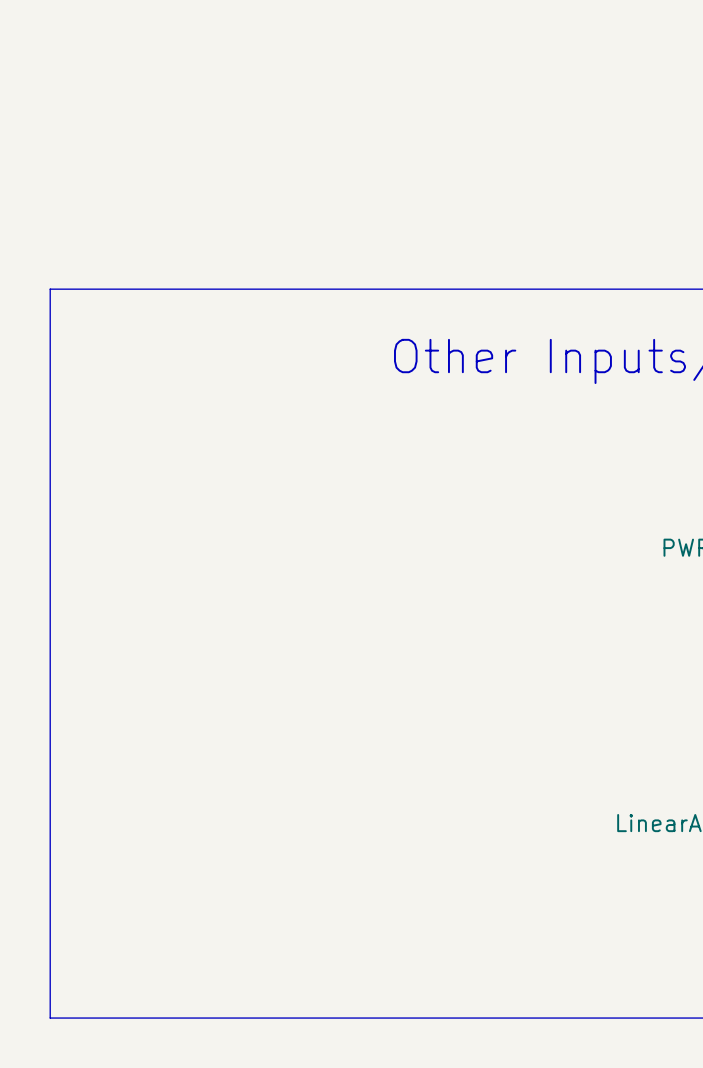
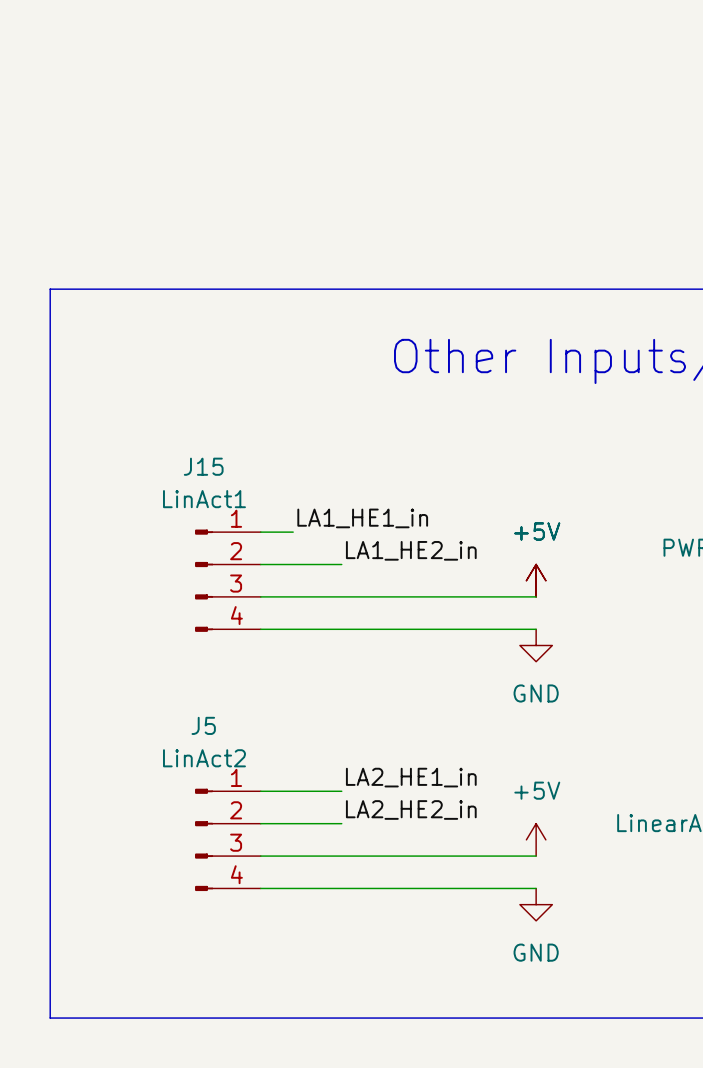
label: none -> LA1_HE1_in (362, 518)
wire: none -> (260, 532) (293, 532)
label: none -> LA1_HE2_in (411, 550)
wire: none -> (260, 564) (341, 564)
J15: none -> LinAct1 (227, 580)
power symbol: none -> +5V (536, 580)
wire: none -> (260, 596) (536, 596)
wire: none -> (260, 629) (536, 629)
power symbol: none -> GND (536, 645)
label: none -> LA2_HE1_in (411, 777)
wire: none -> (260, 791) (341, 791)
label: none -> LA2_HE2_in (411, 809)
wire: none -> (260, 823) (341, 823)
J5: none -> LinAct2 (227, 839)
power symbol: none -> +5V (536, 839)
wire: none -> (260, 856) (536, 856)
wire: none -> (260, 888) (536, 888)
power symbol: none -> GND (536, 904)

